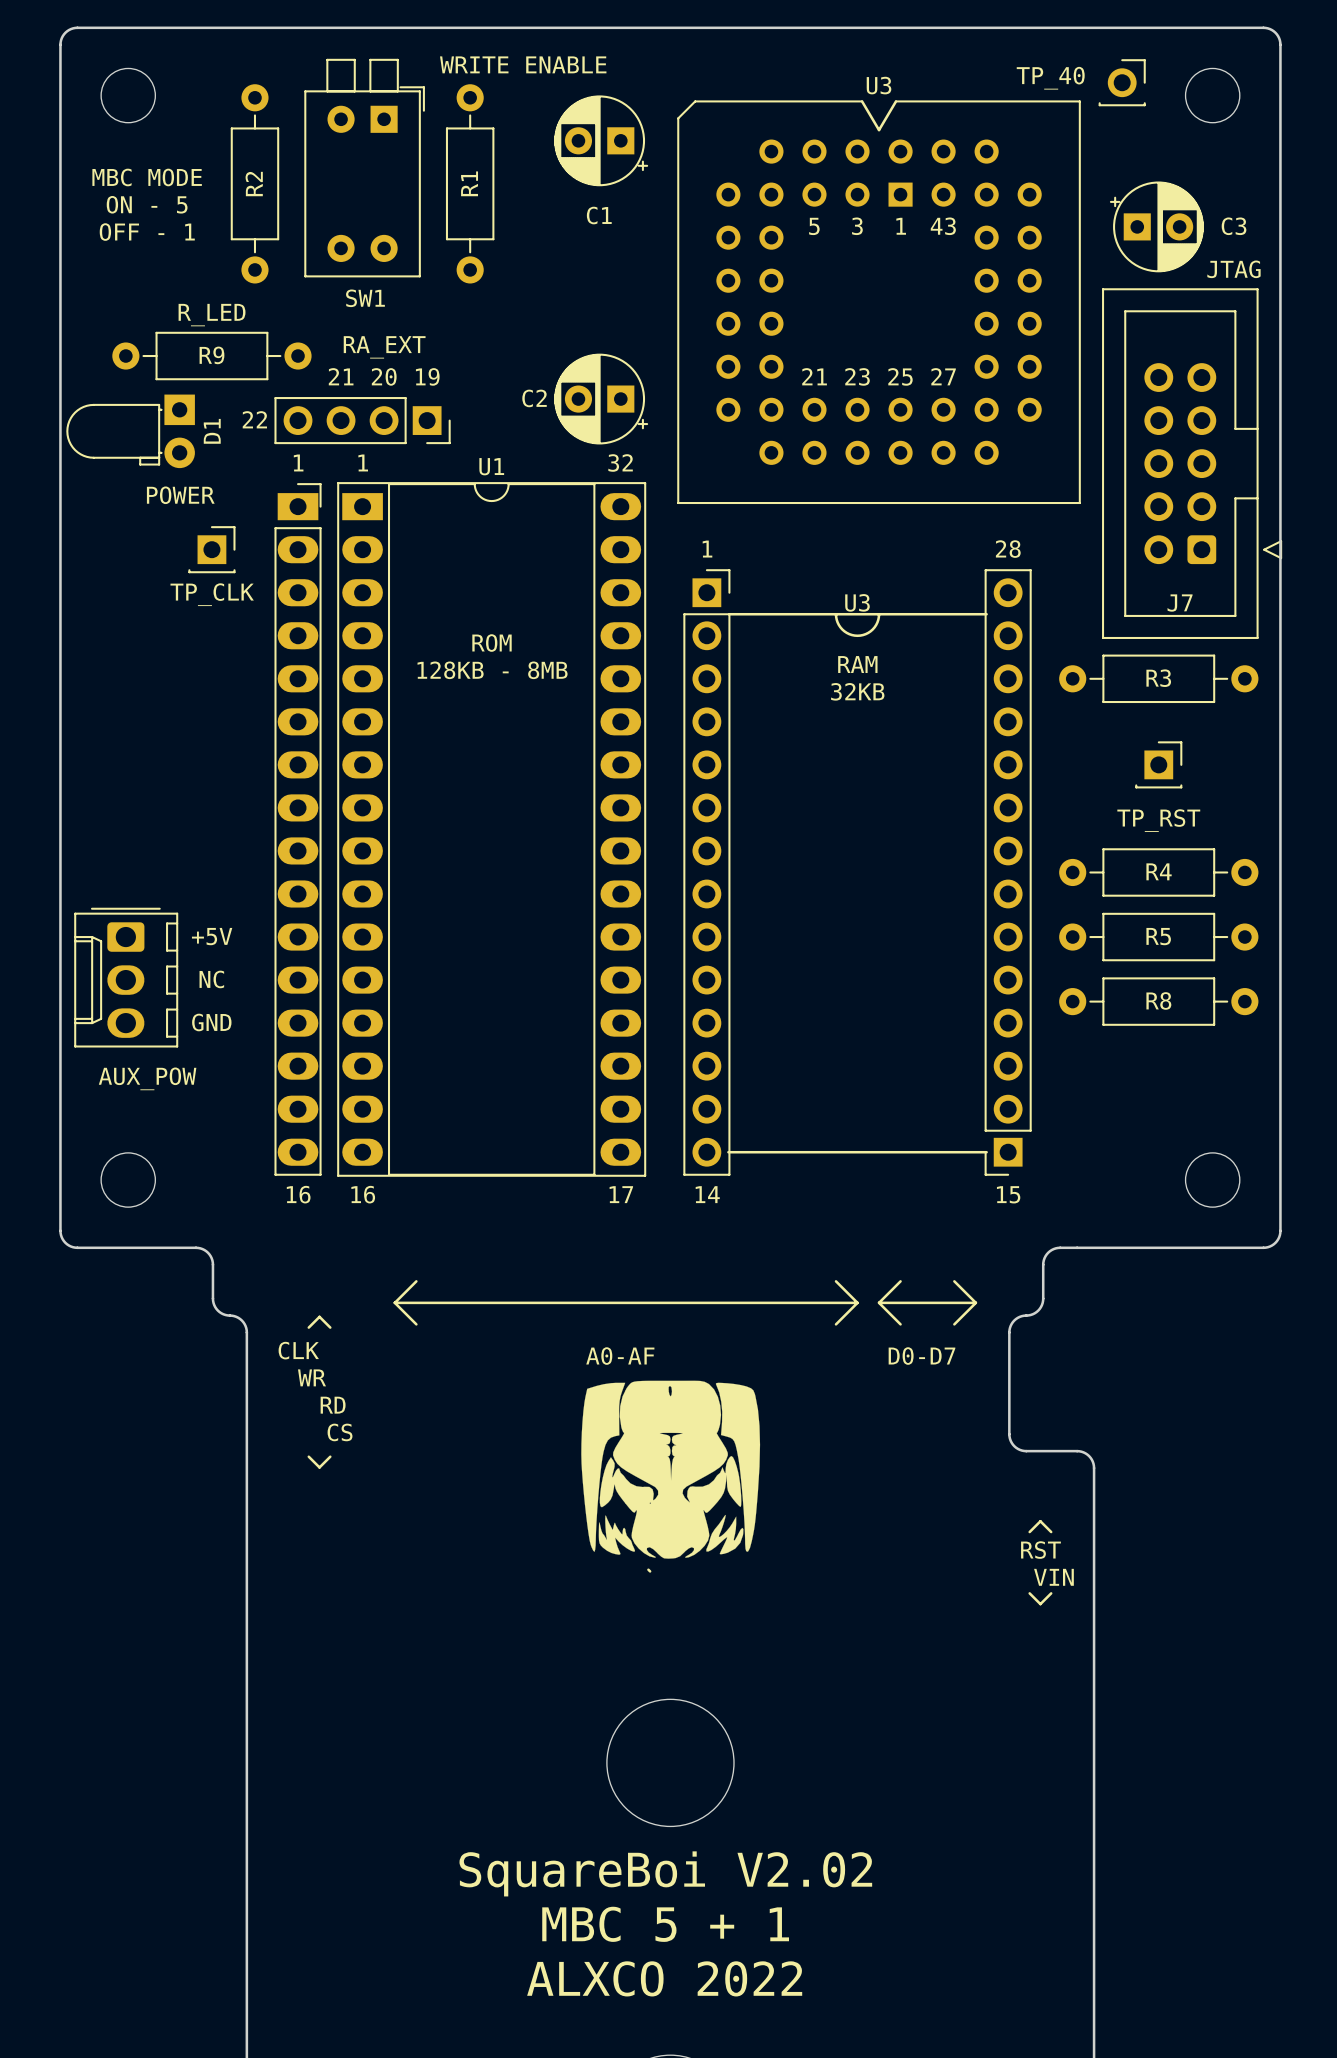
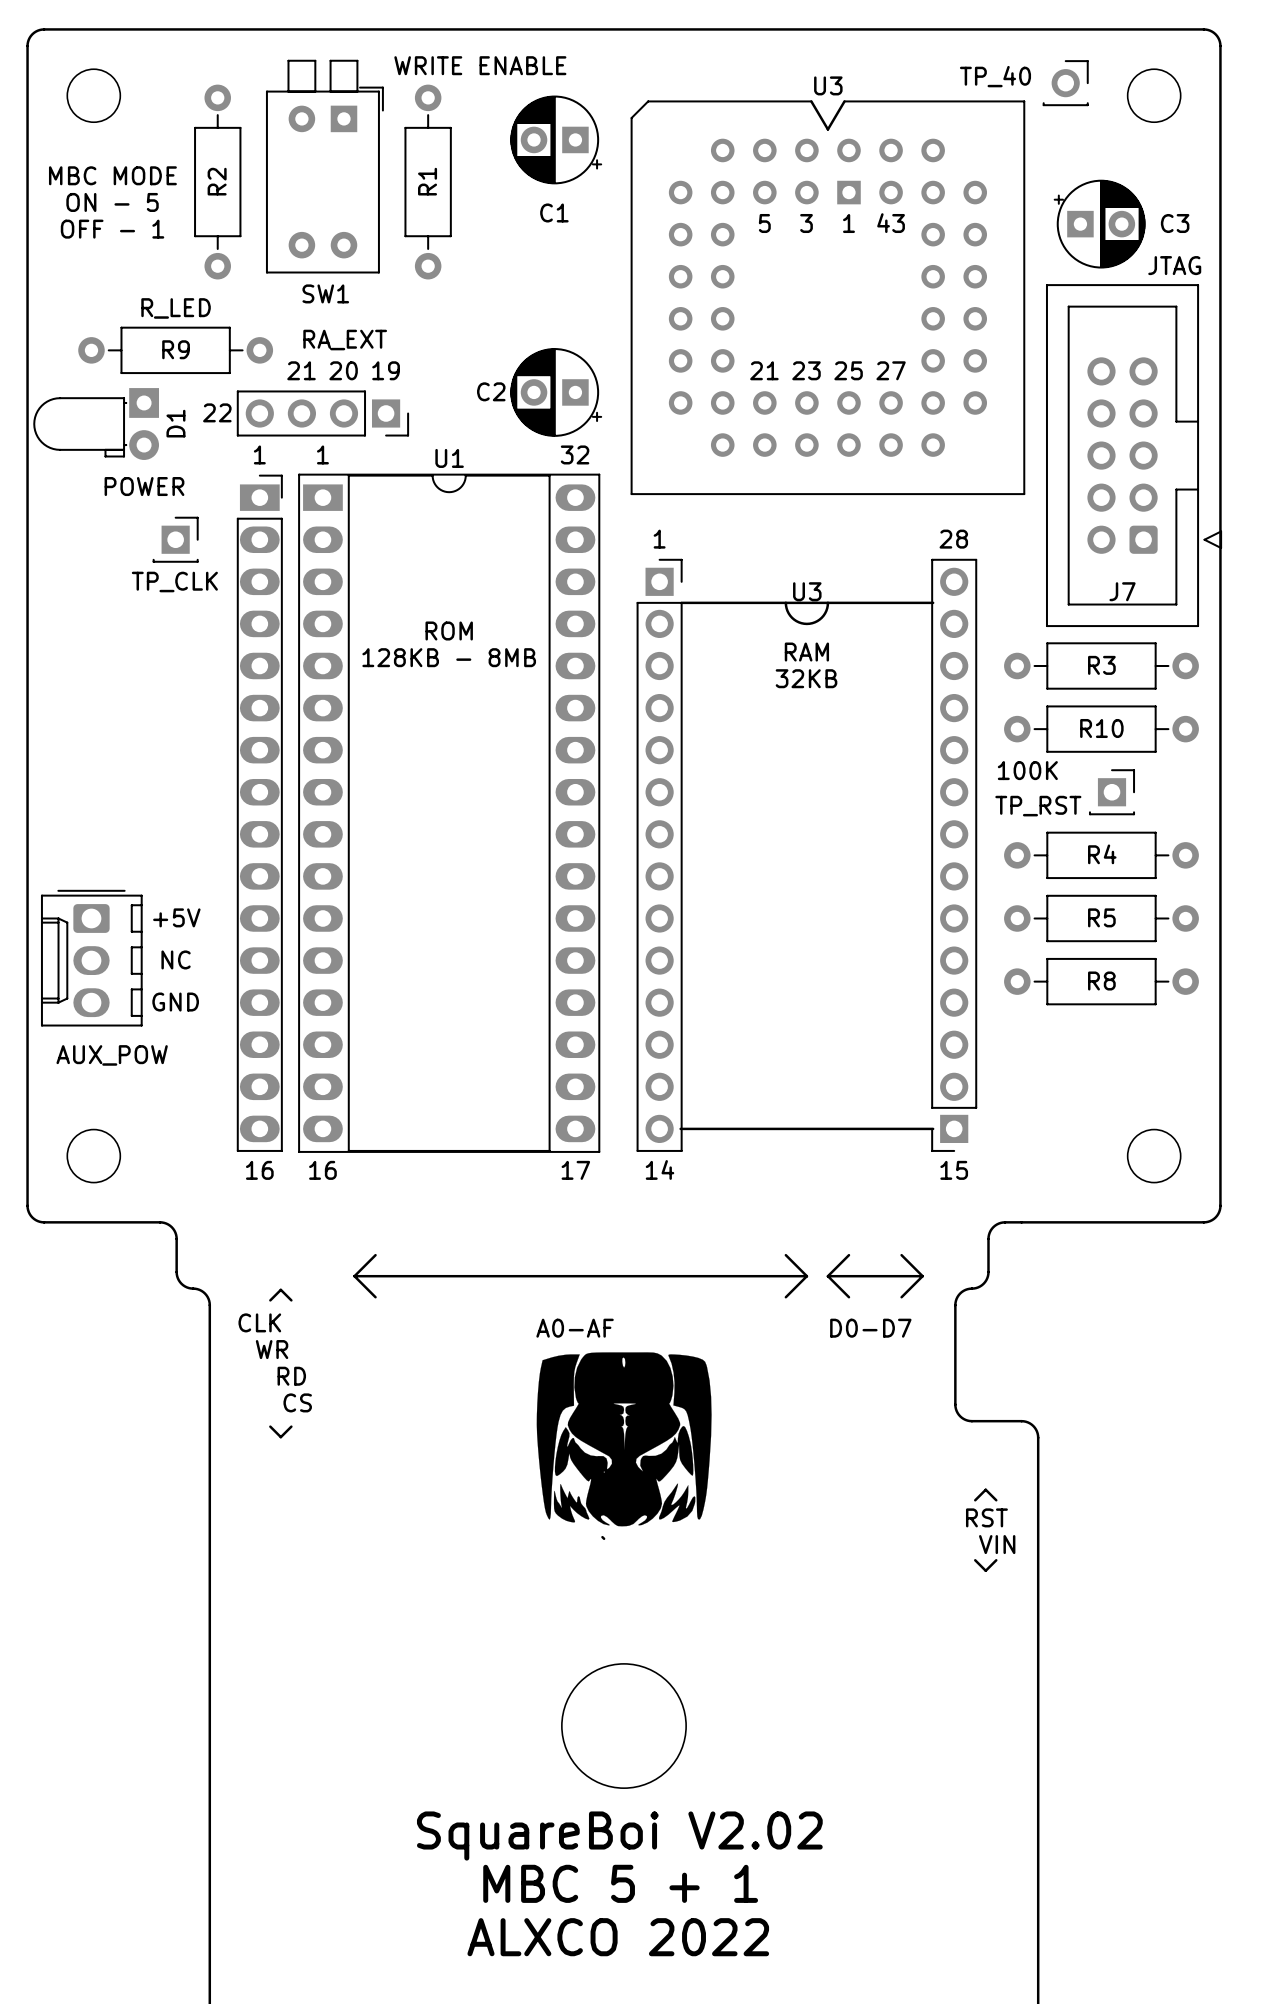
R10: none -> 100K (1101, 729)
part position: (1158, 764) -> (1112, 792)
part value position: TP_RST (1158, 820) -> TP_RST (1038, 806)

